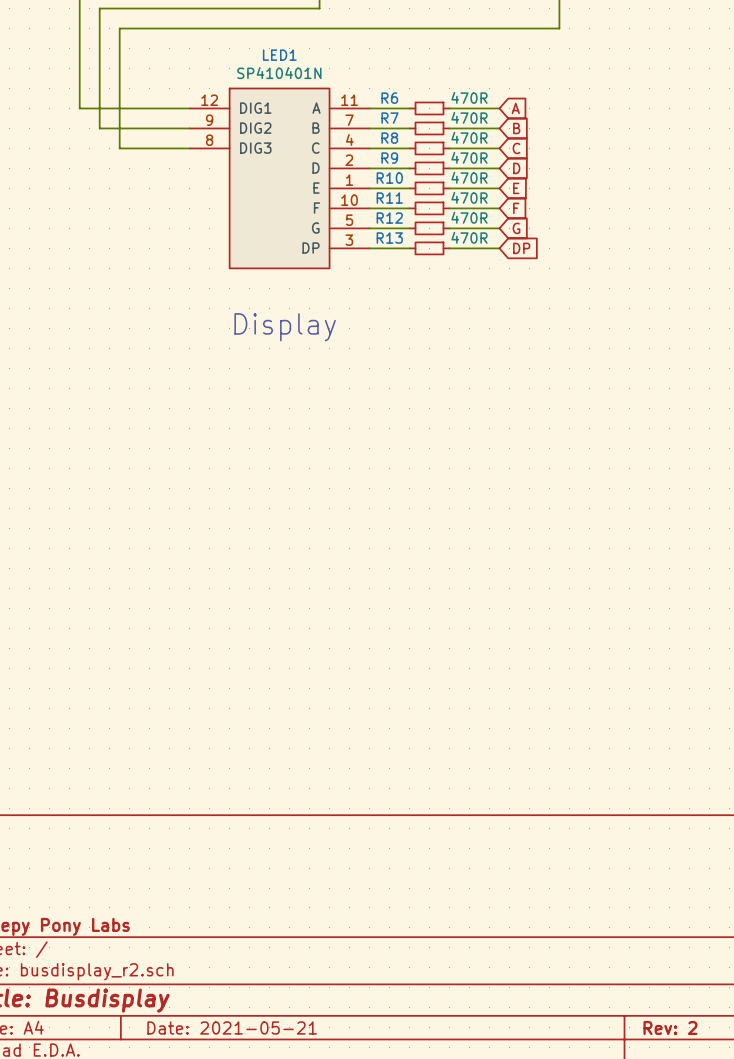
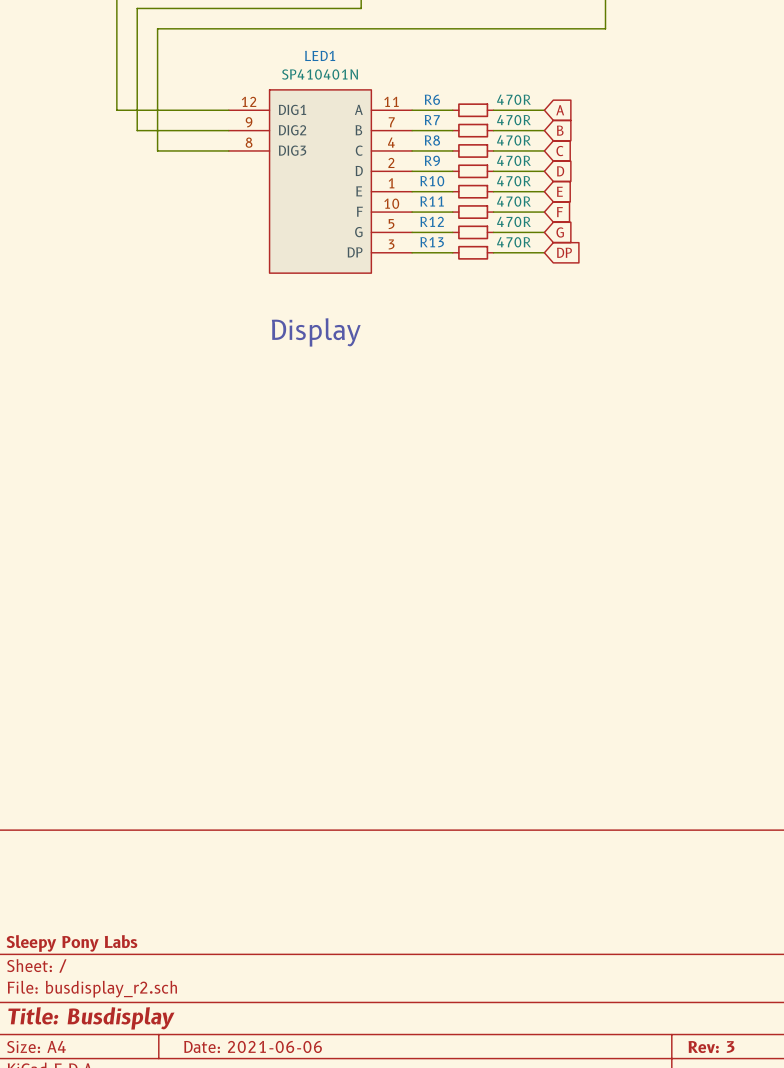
title block: Date: 2021-05-21 (232, 1028) -> Date: 2021-06-06 (253, 1046)
title block: Rev: 2 (670, 1028) -> Rev: 3 (711, 1047)

